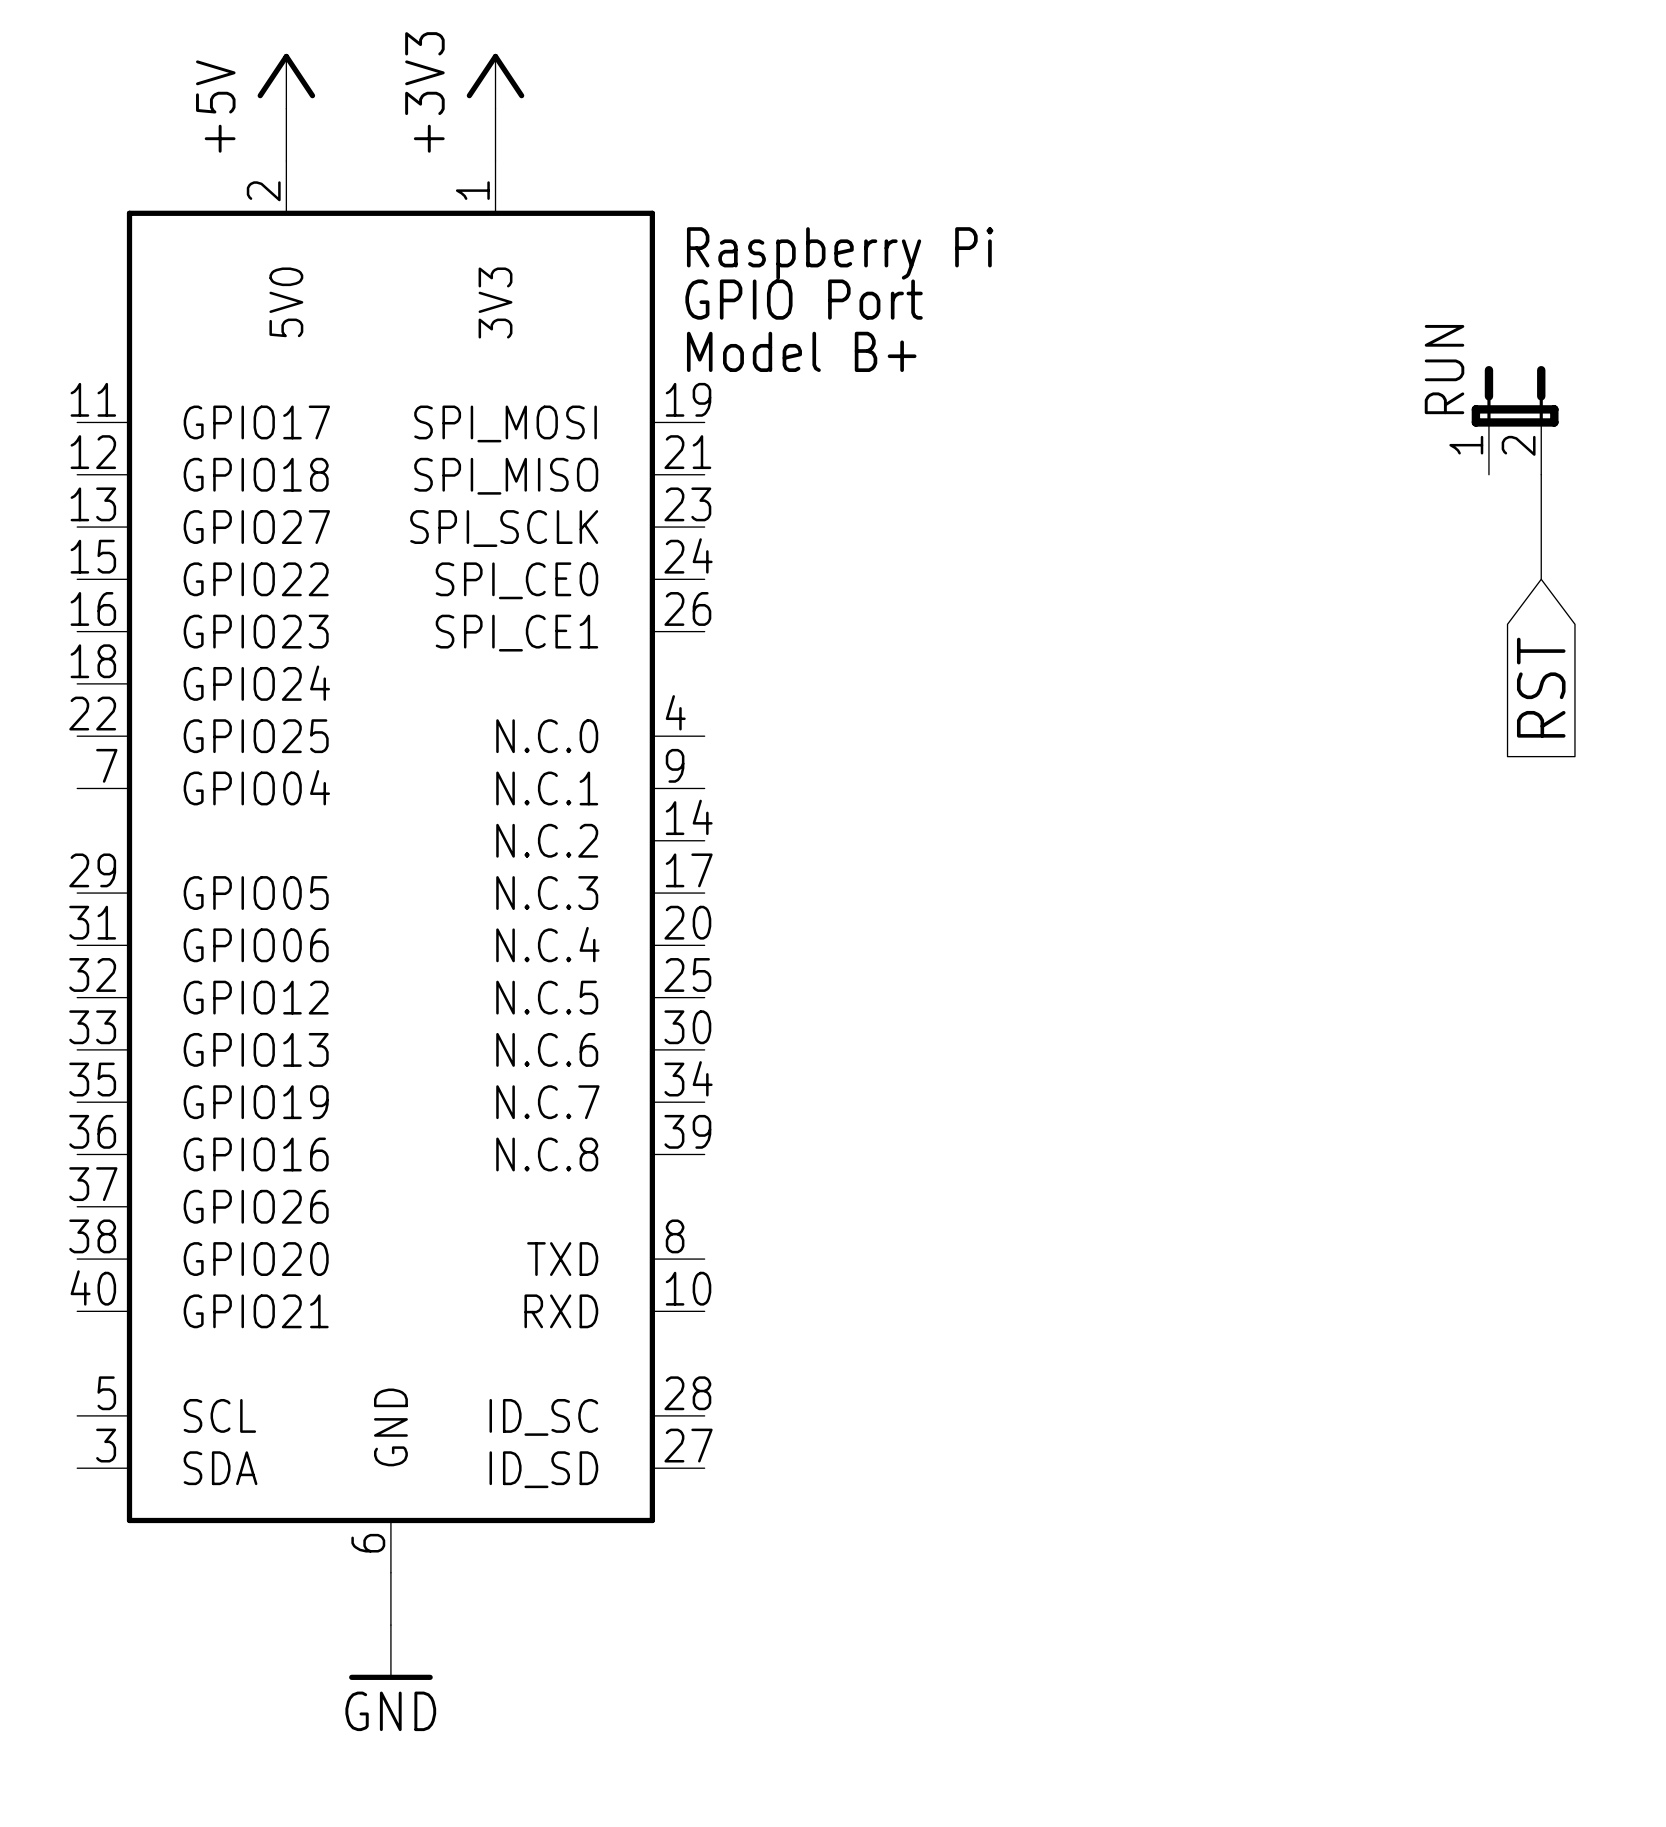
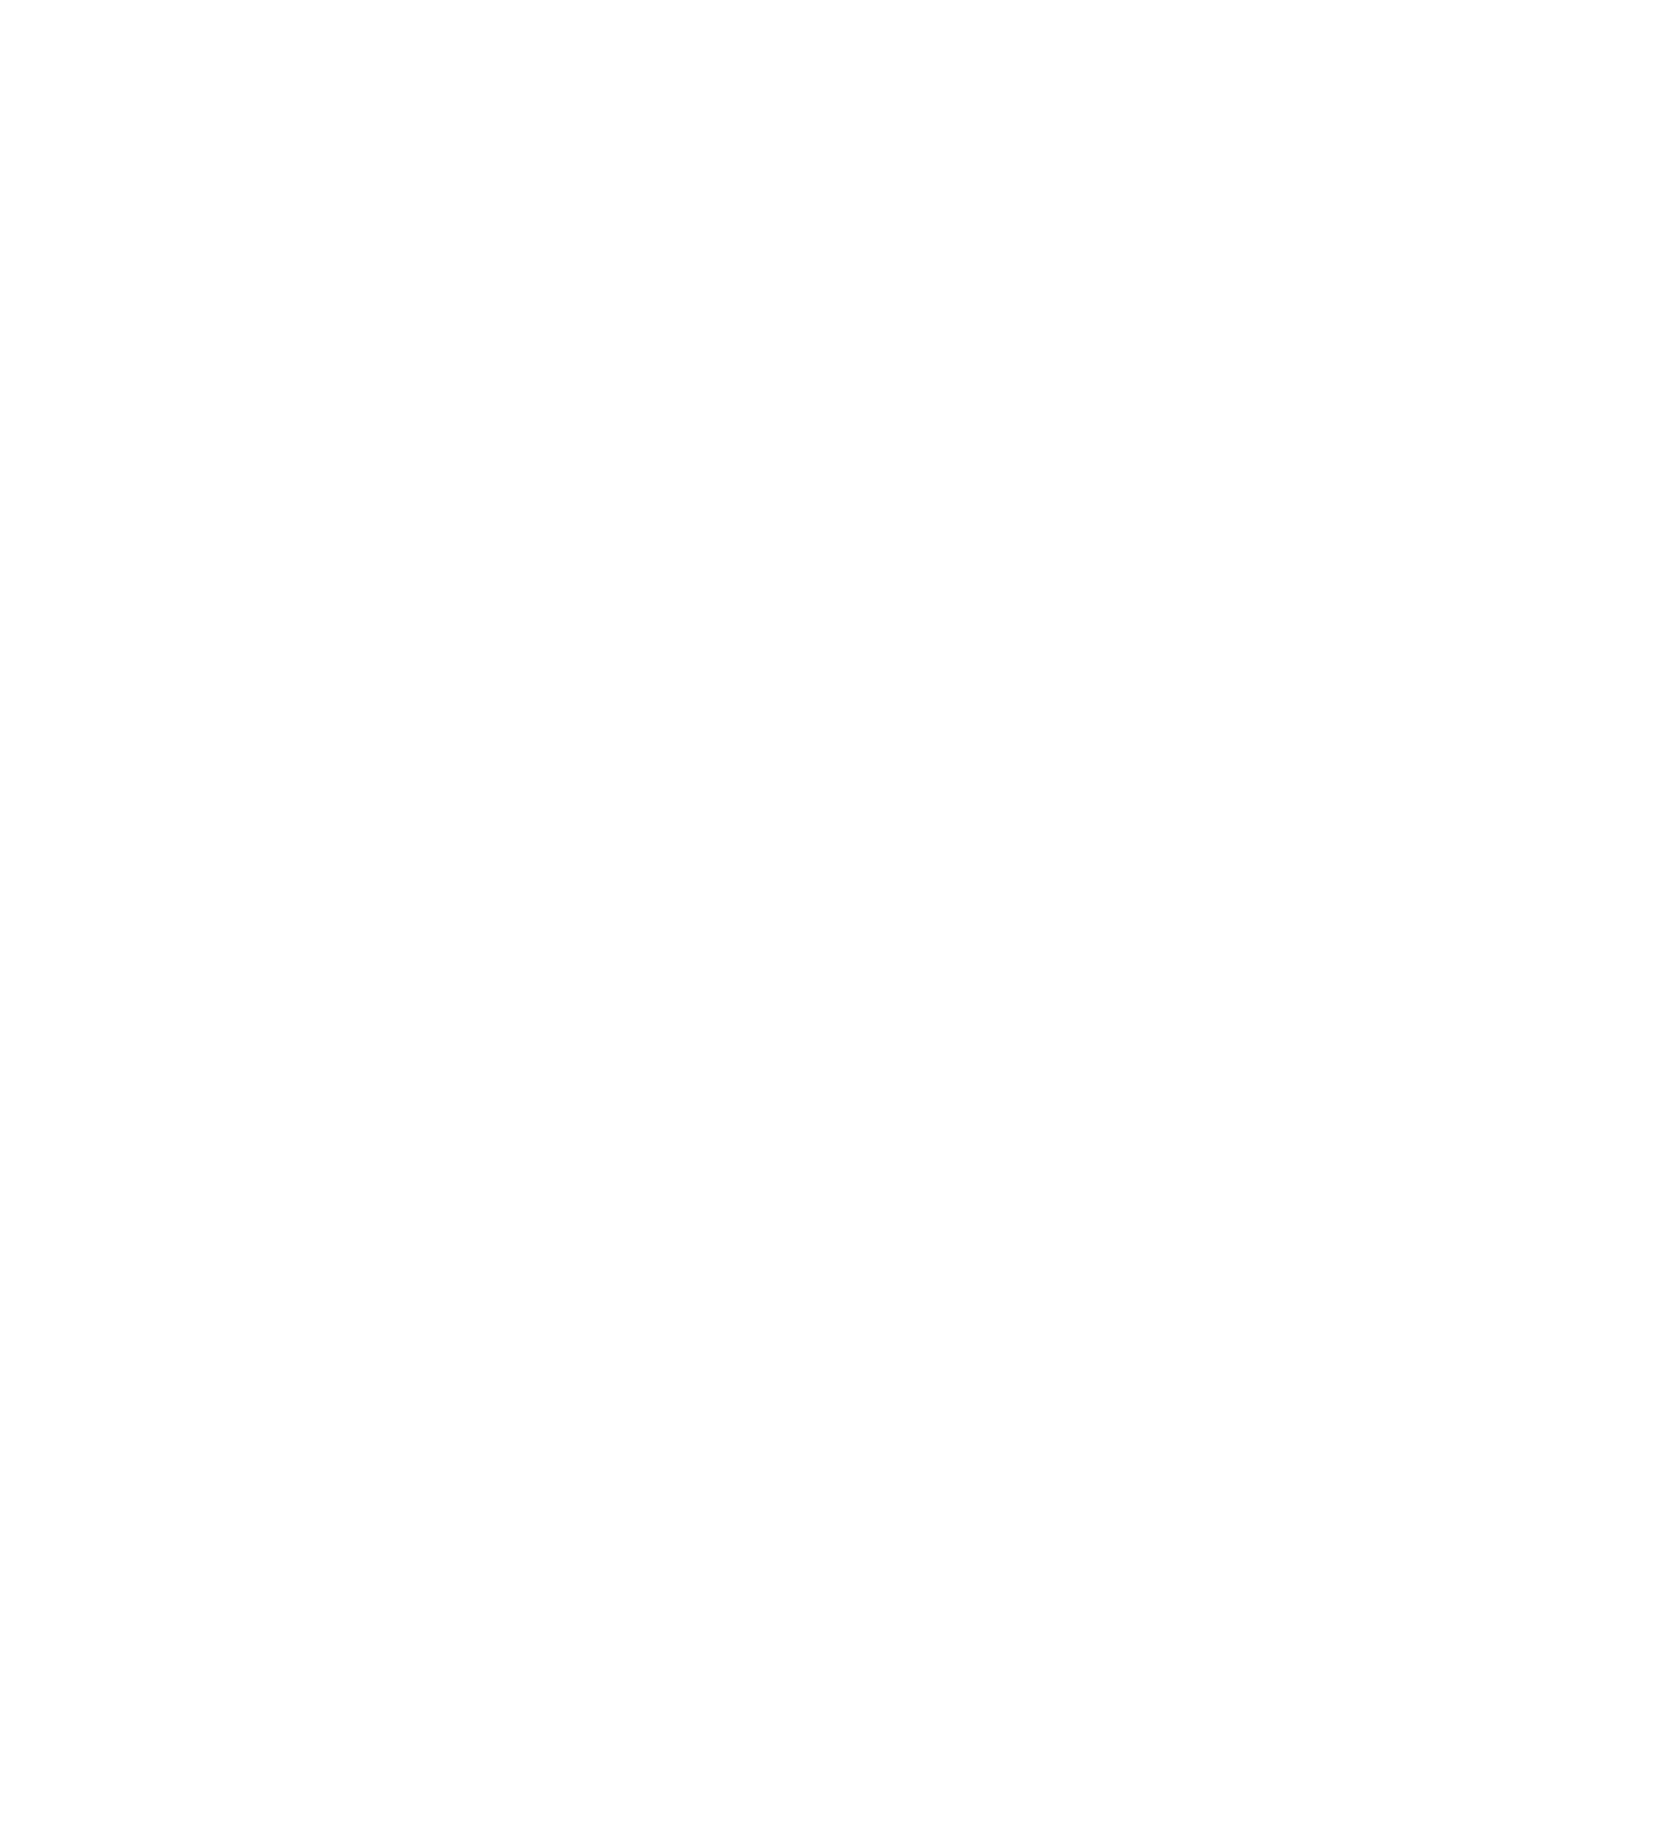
power symbol: +5V (286, 81) -> none
power symbol: +3V3 (495, 81) -> none
wire: (286, 108) (286, 161) -> none
wire: (495, 108) (495, 161) -> none
RUN: (1515, 420) -> none
wire: (1541, 474) (1541, 579) -> none
global label: RST (1541, 687) -> none
part: (390, 866) -> none
wire: (390, 1572) (390, 1625) -> none
power symbol: GND (390, 1652) -> none

